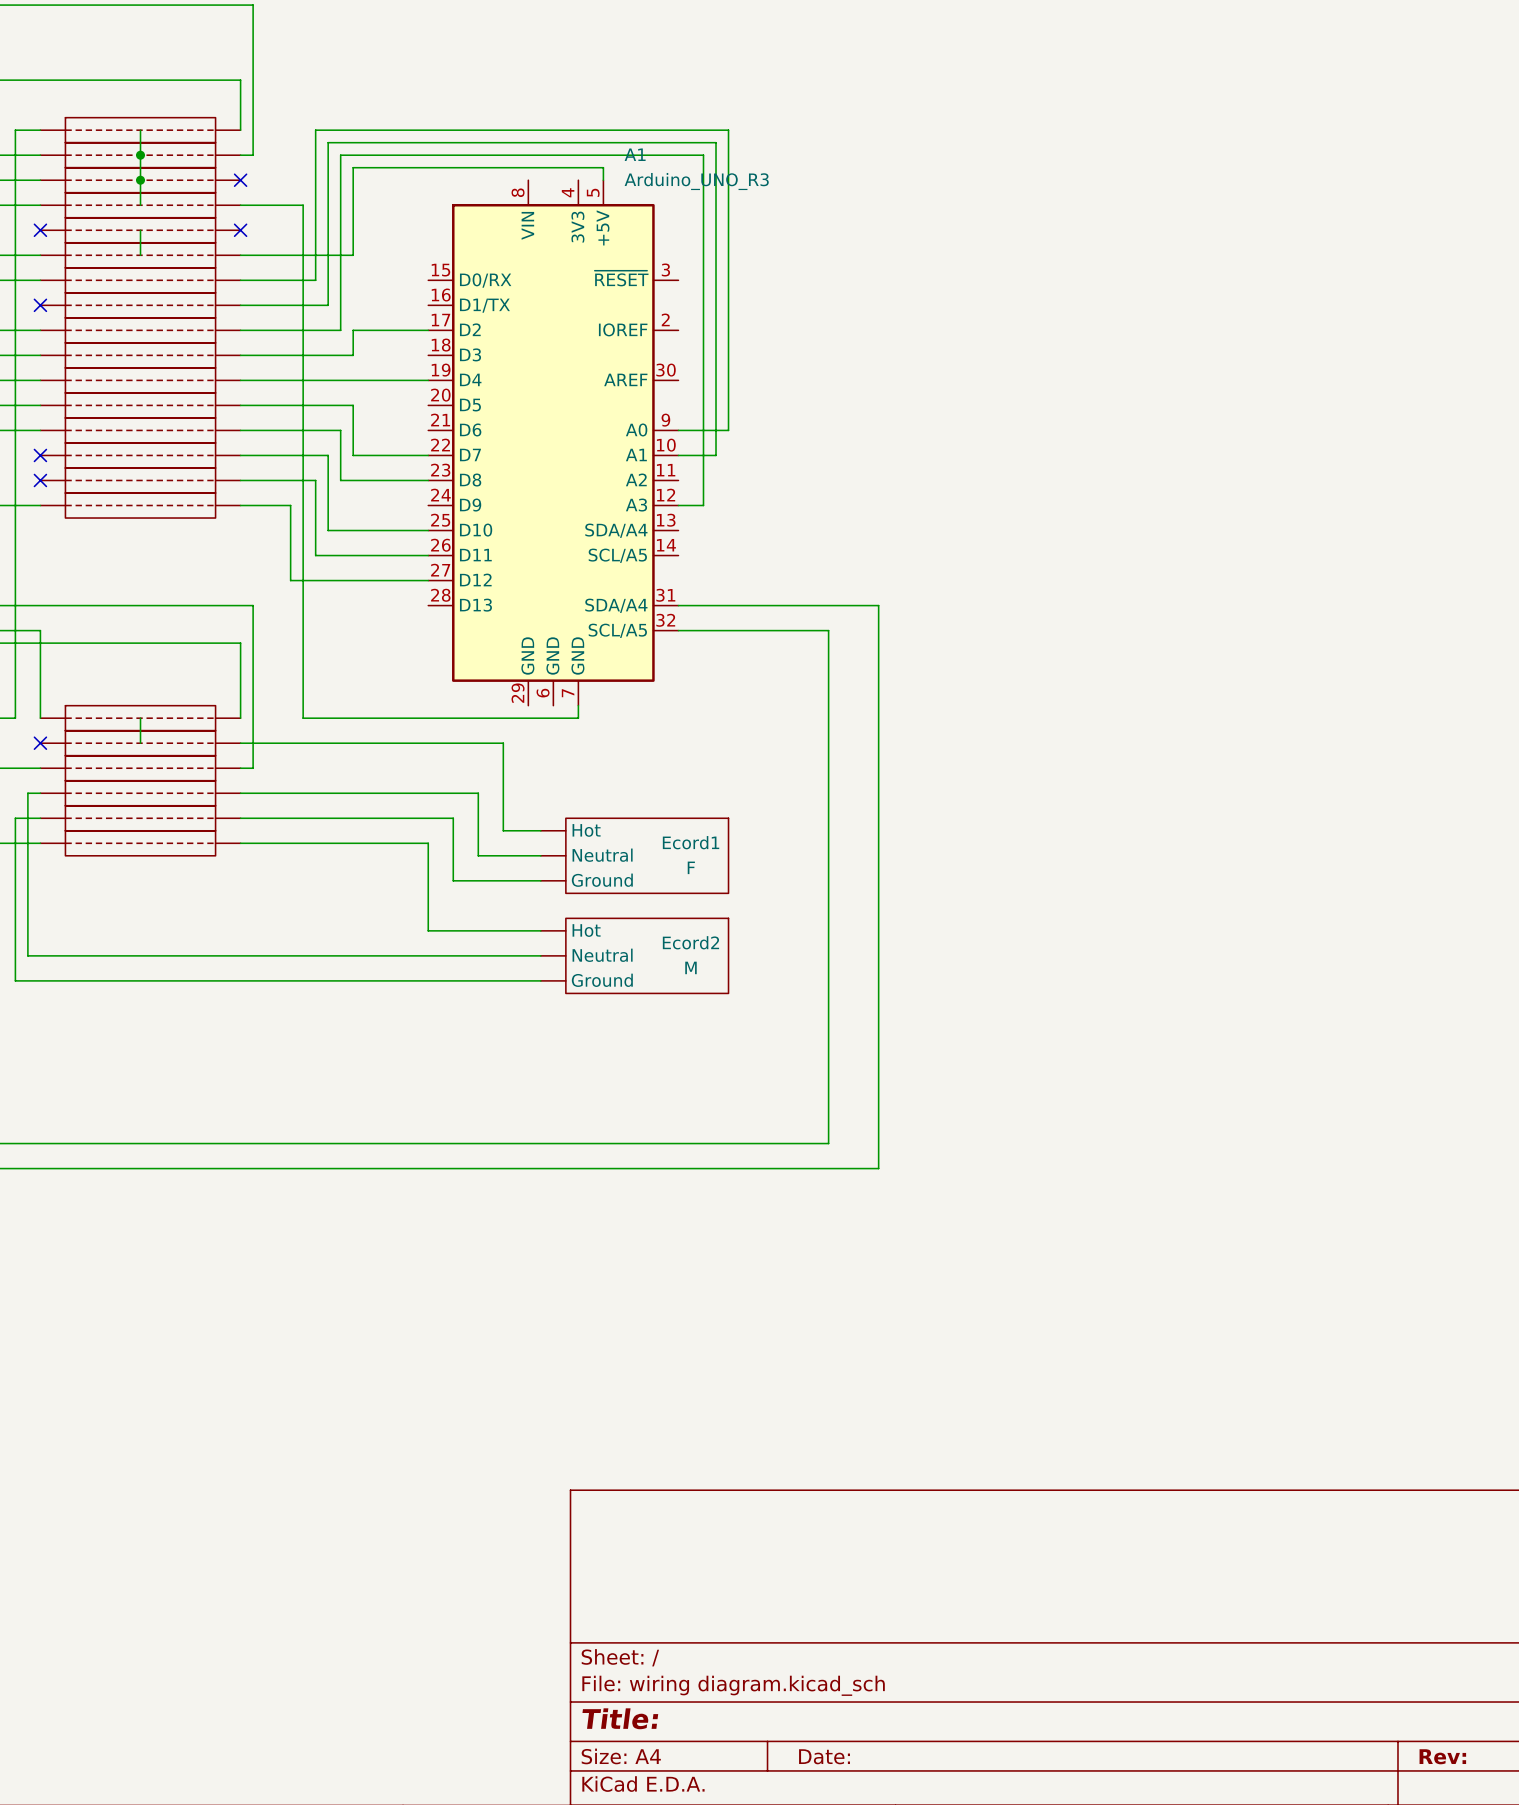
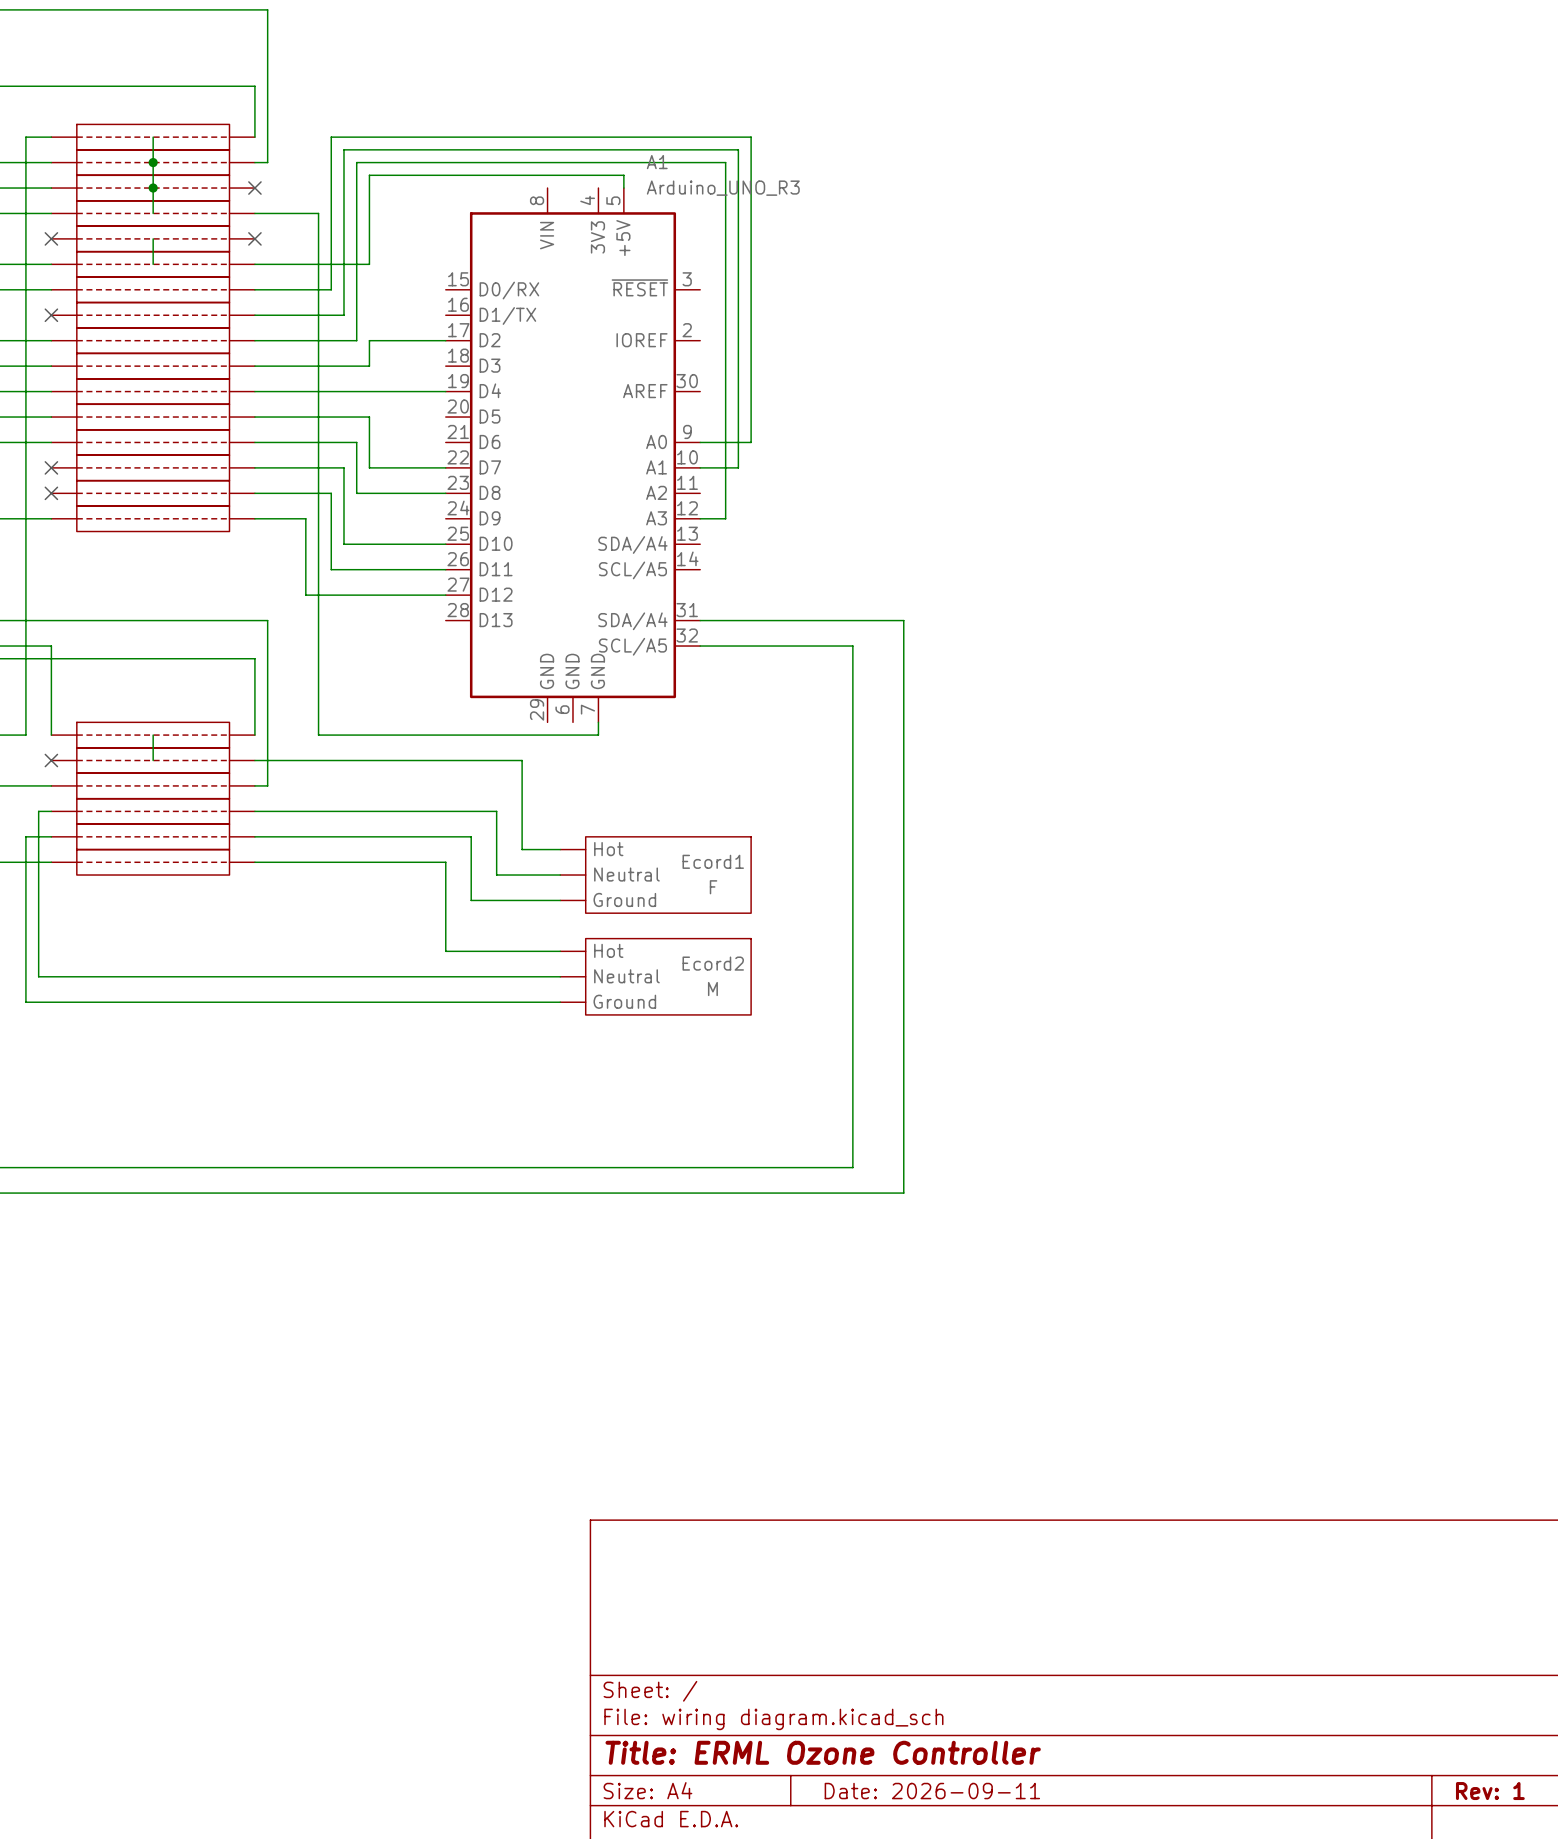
title block: Title: (620, 1718) -> Title: ERML Ozone Controller (823, 1752)
title block: Date: (824, 1756) -> Date: 2026-09-11 (932, 1791)
title block: Rev: (1442, 1756) -> Rev: 1 (1490, 1791)

